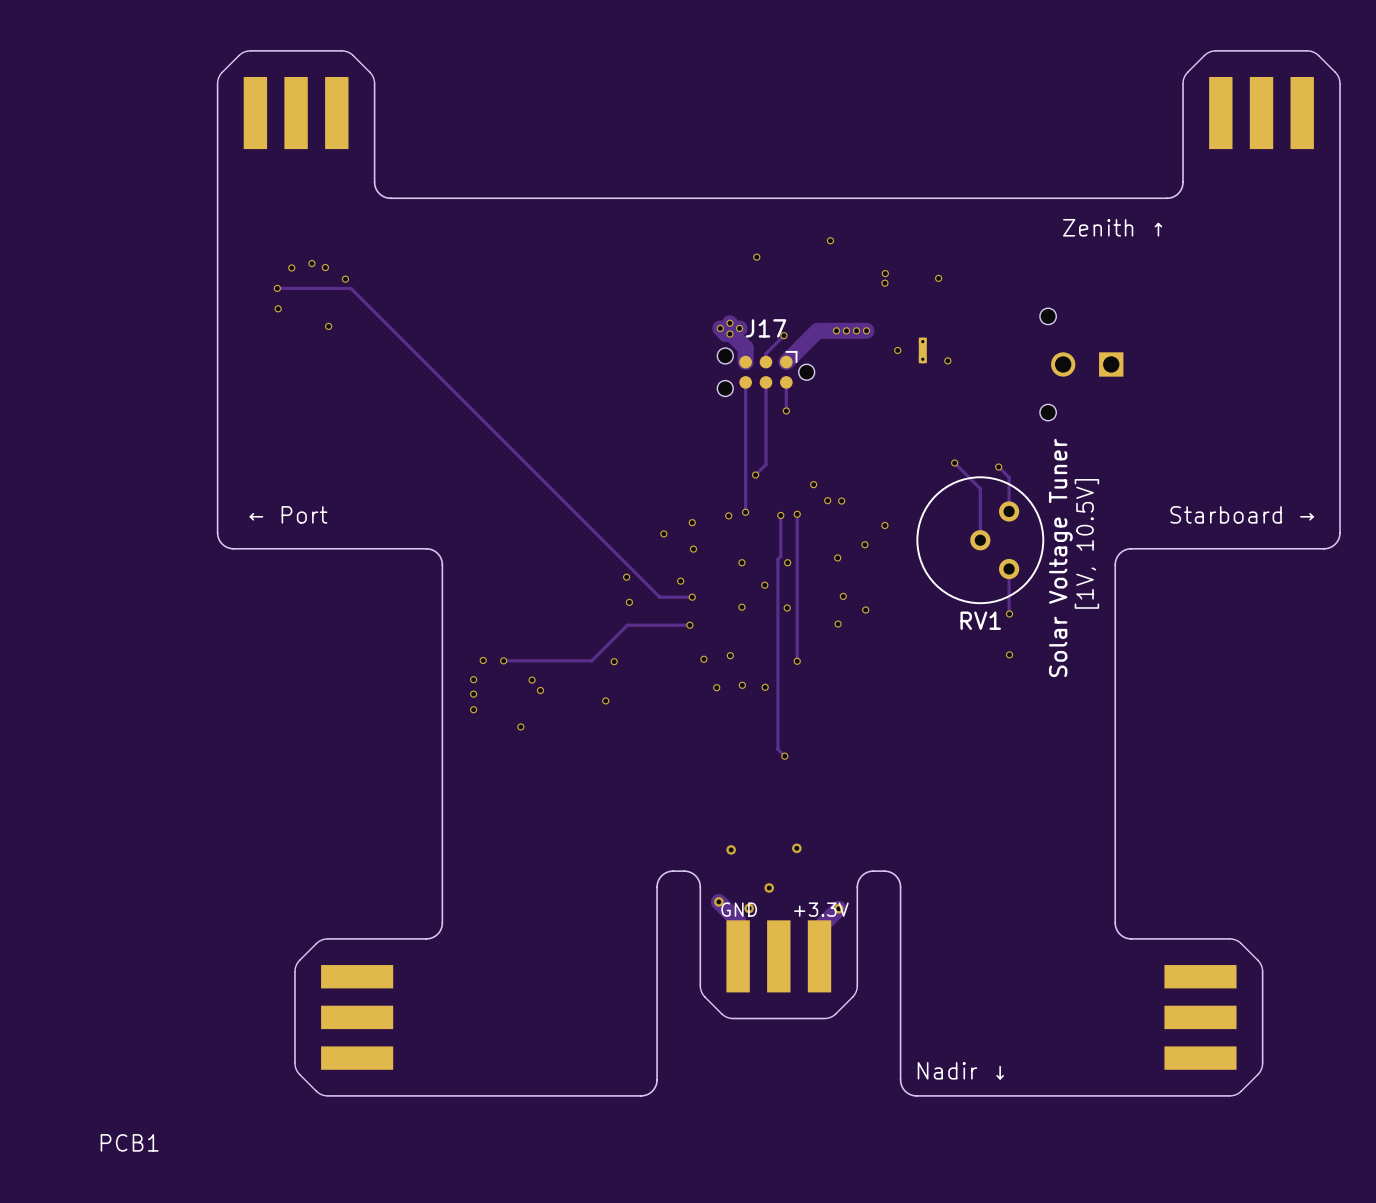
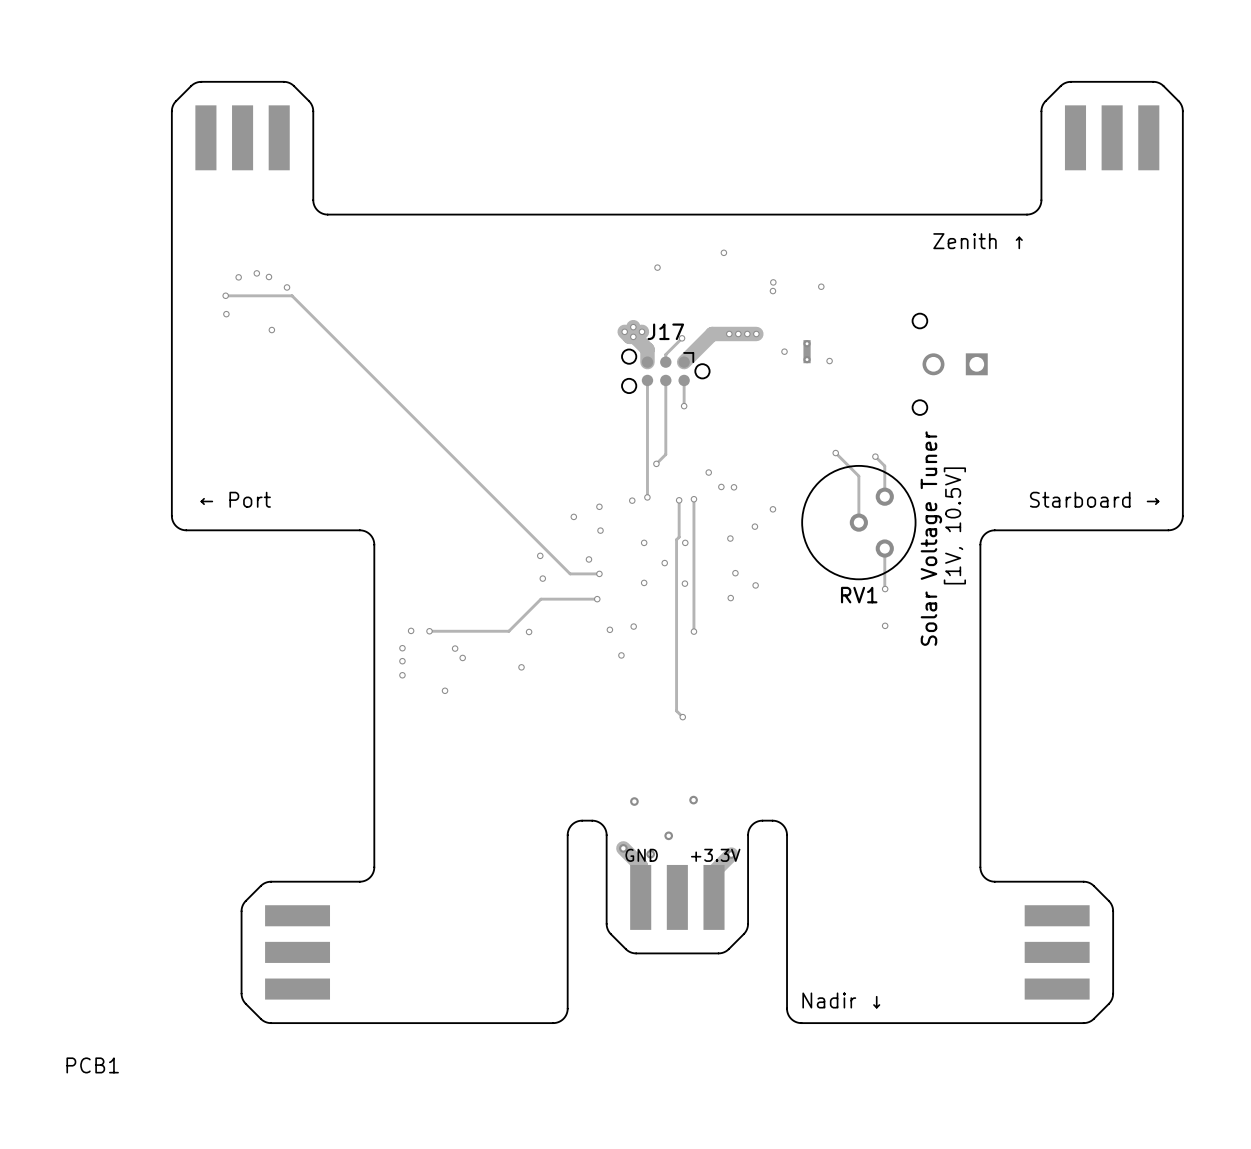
via: (742, 685) -> none
via: (765, 687) -> none

